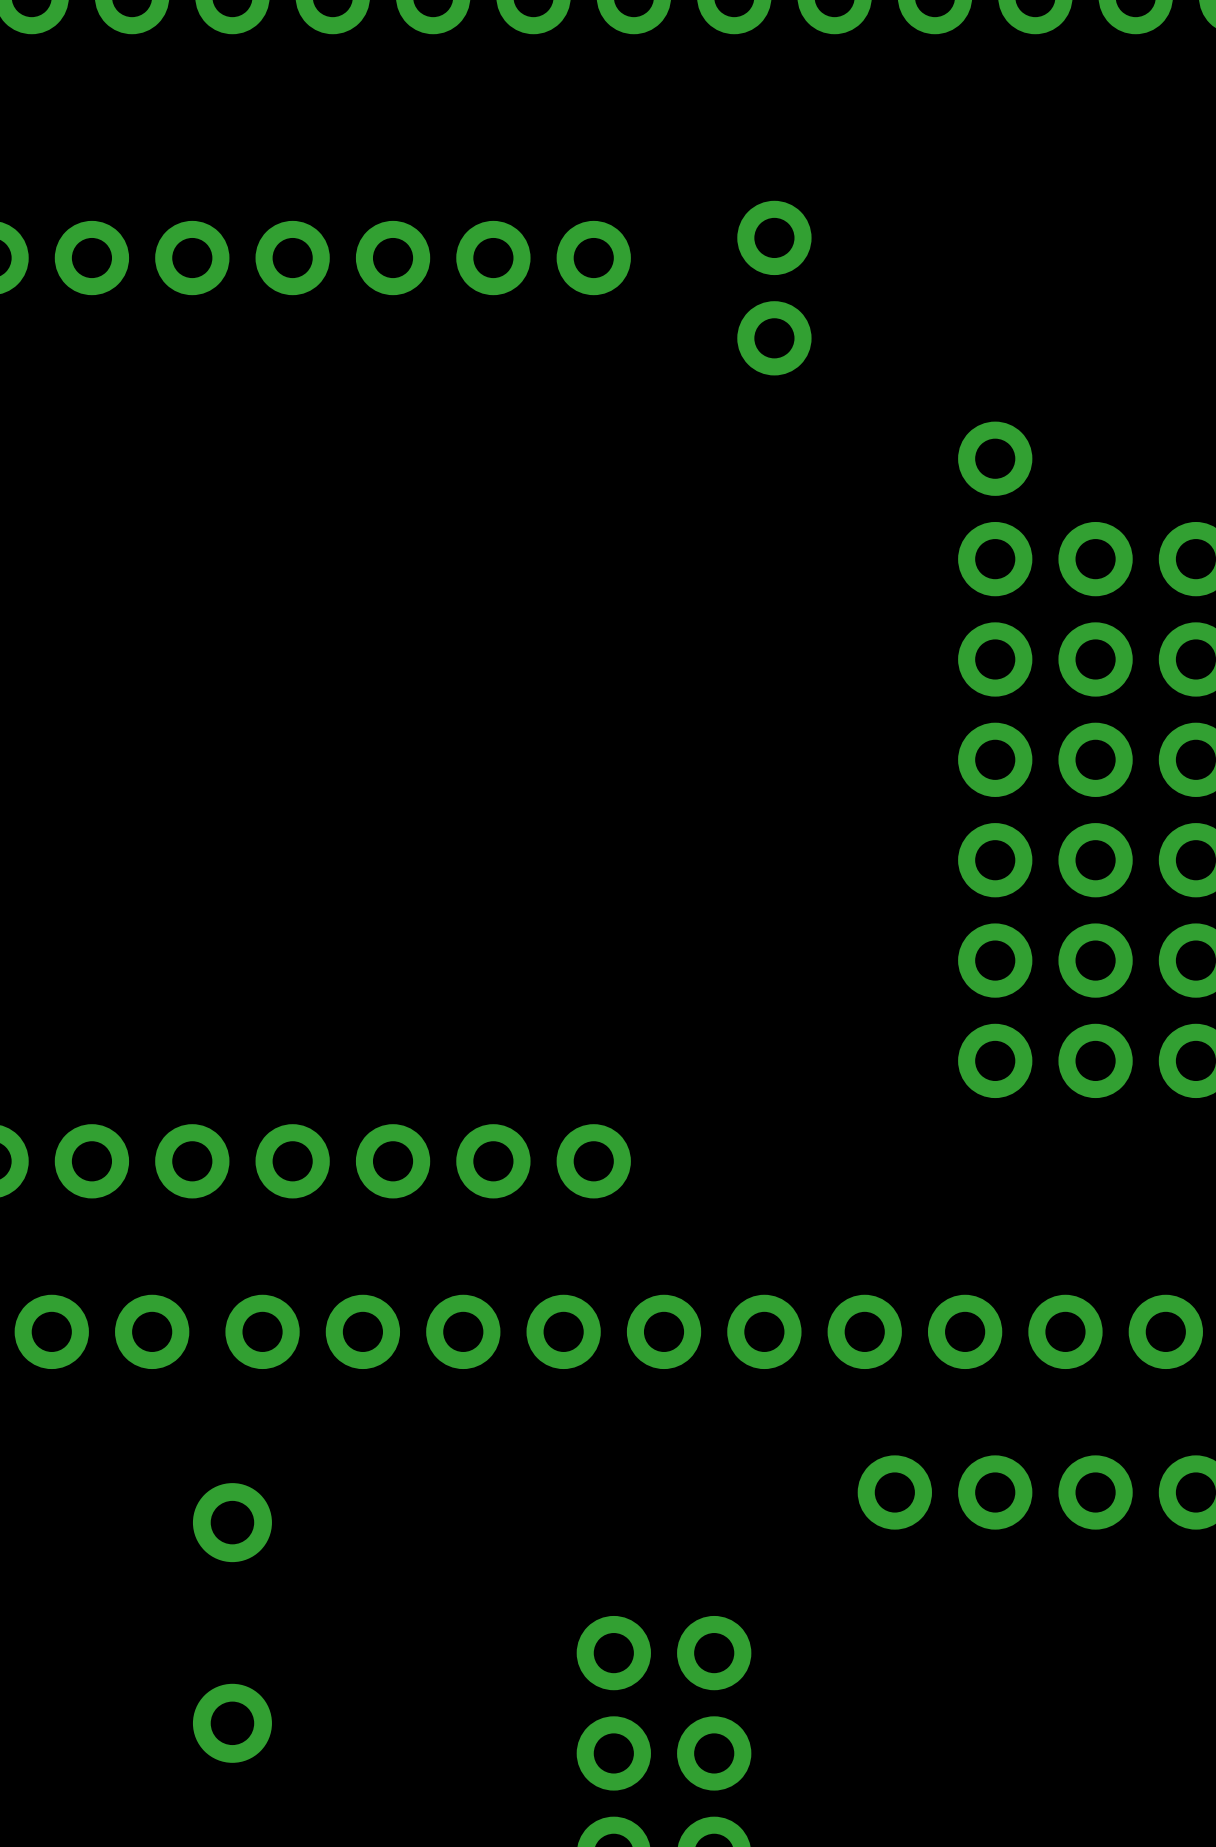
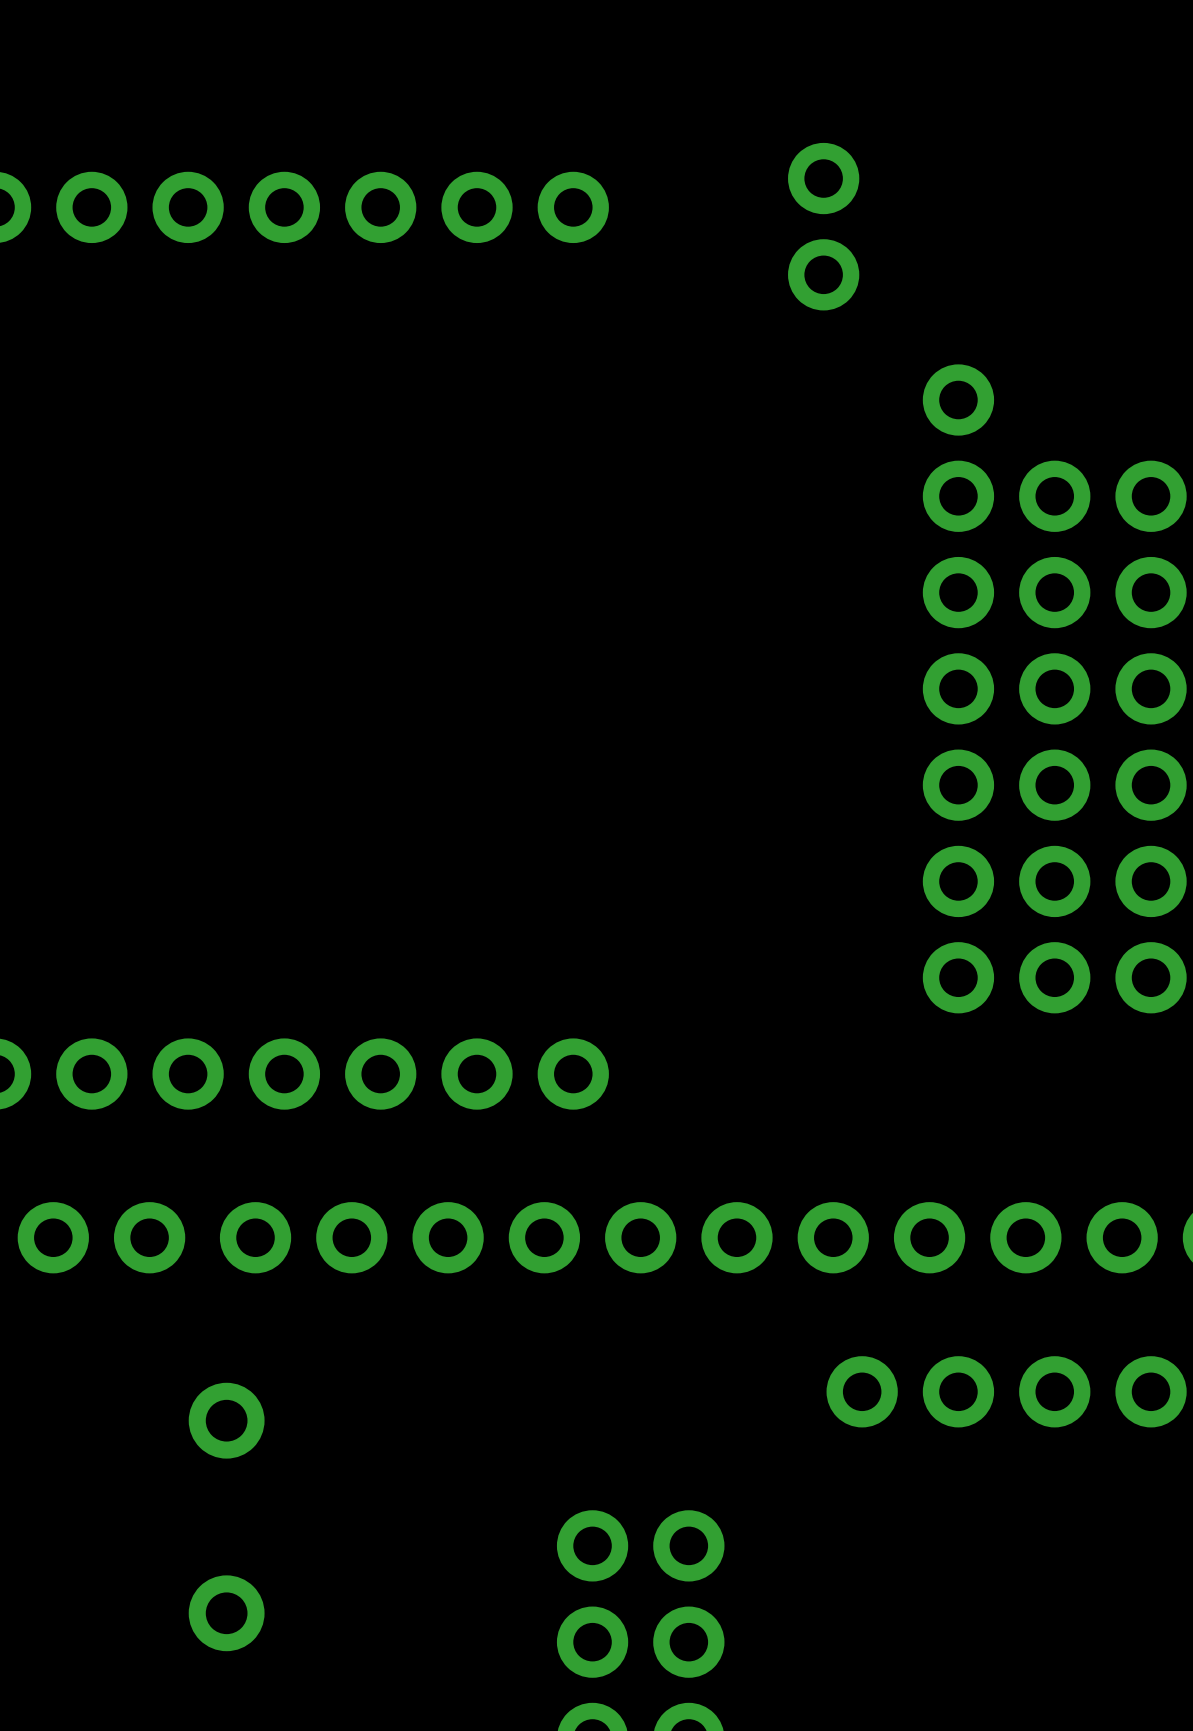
part position: (774, 288) -> (823, 226)

